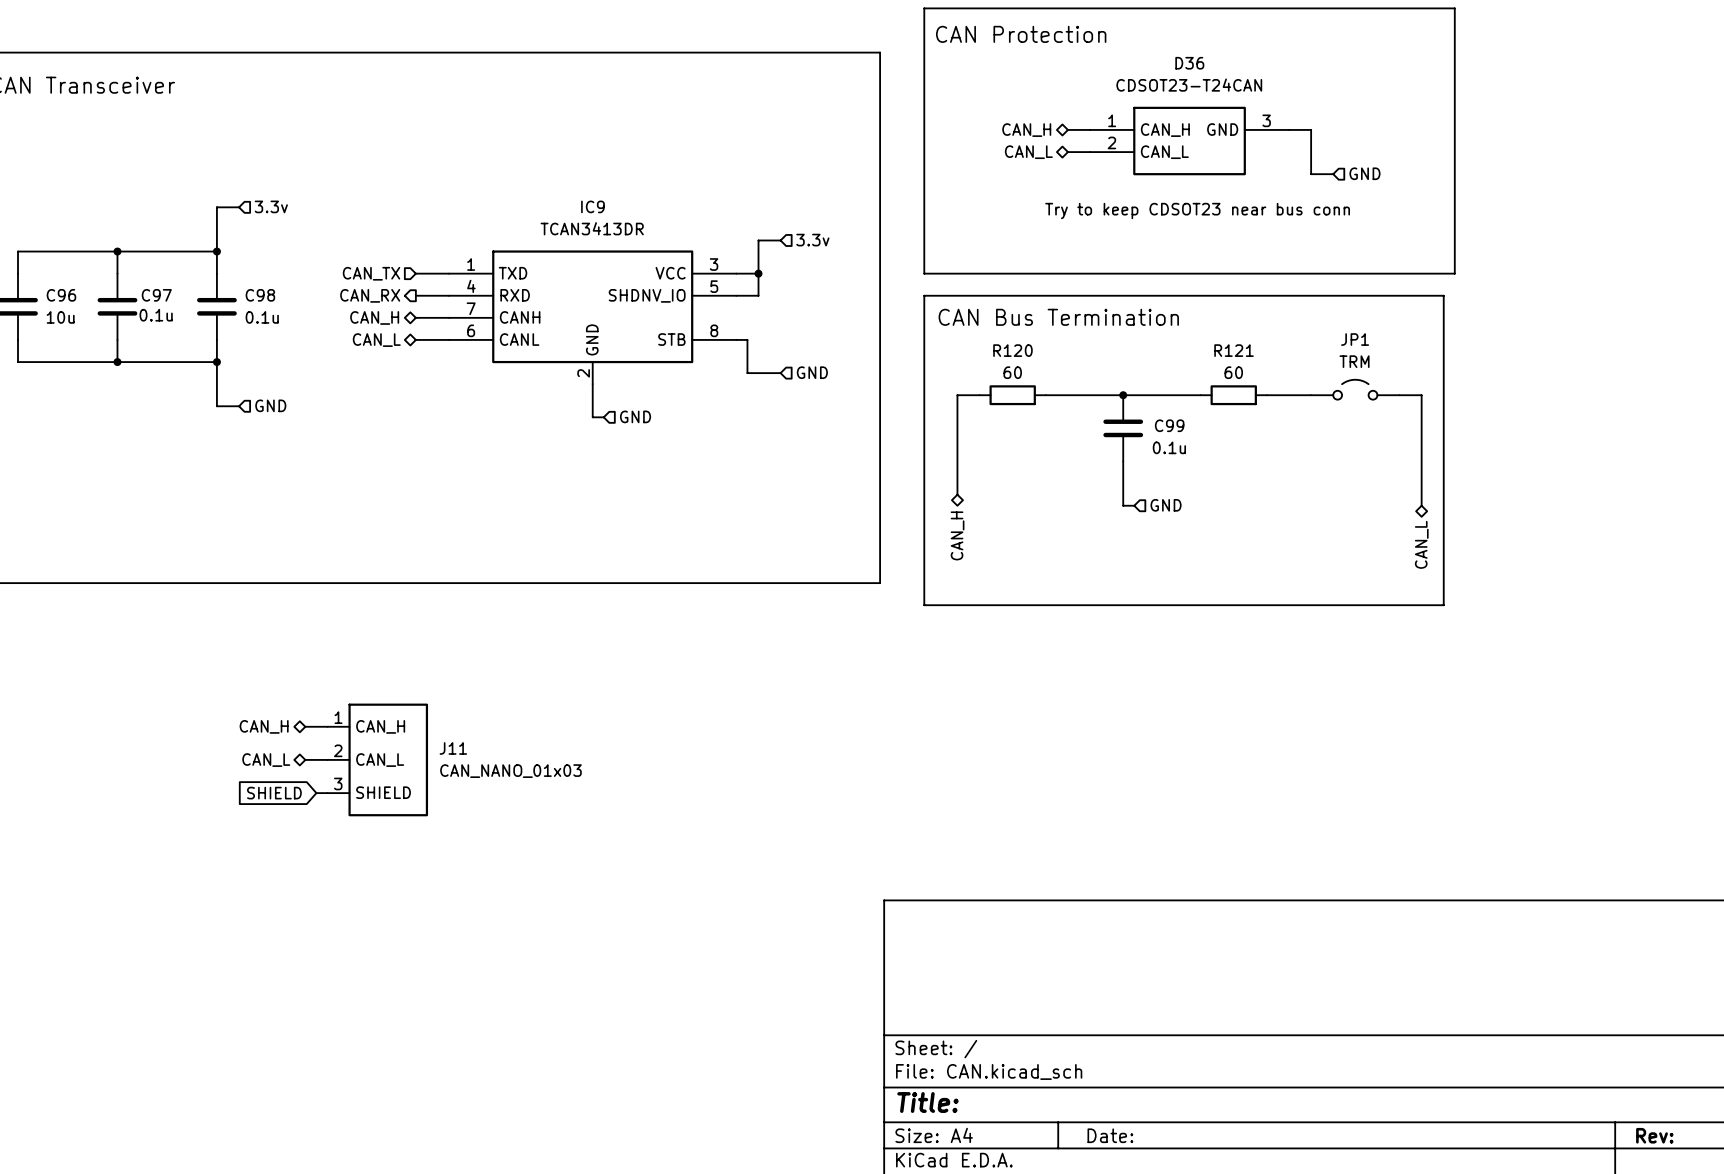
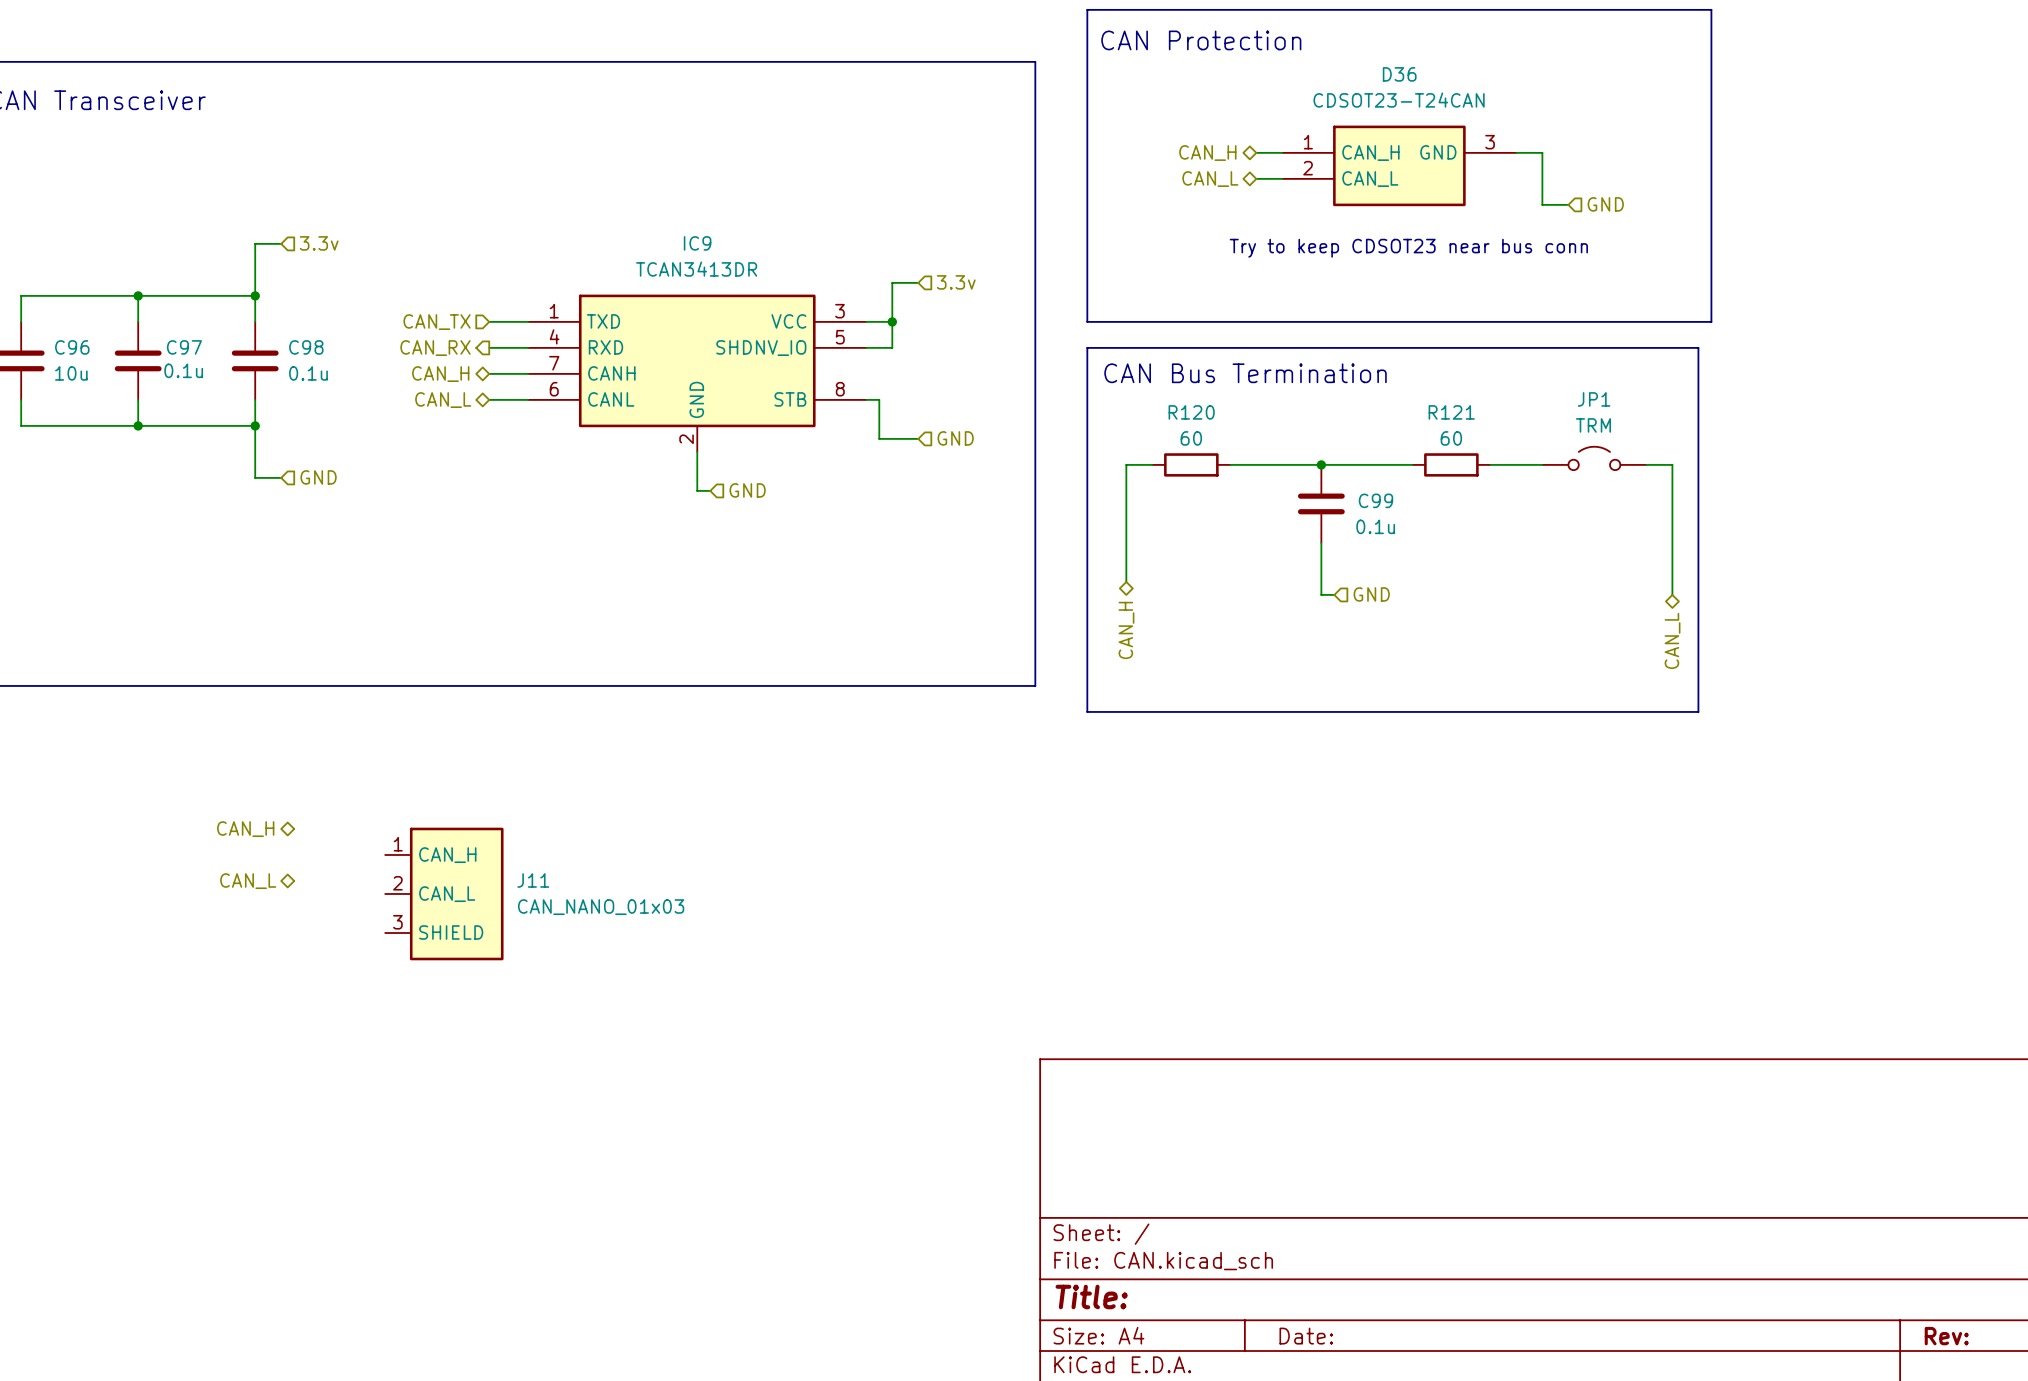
hierarchical label position: CAN_H (264, 726) -> CAN_H (245, 829)
wire: (305, 726) (327, 726) -> none
wire: (305, 759) (327, 759) -> none
hierarchical label position: CAN_L (266, 760) -> CAN_L (248, 881)
global label: SHIELD (274, 793) -> none
wire: (316, 793) (327, 793) -> none

